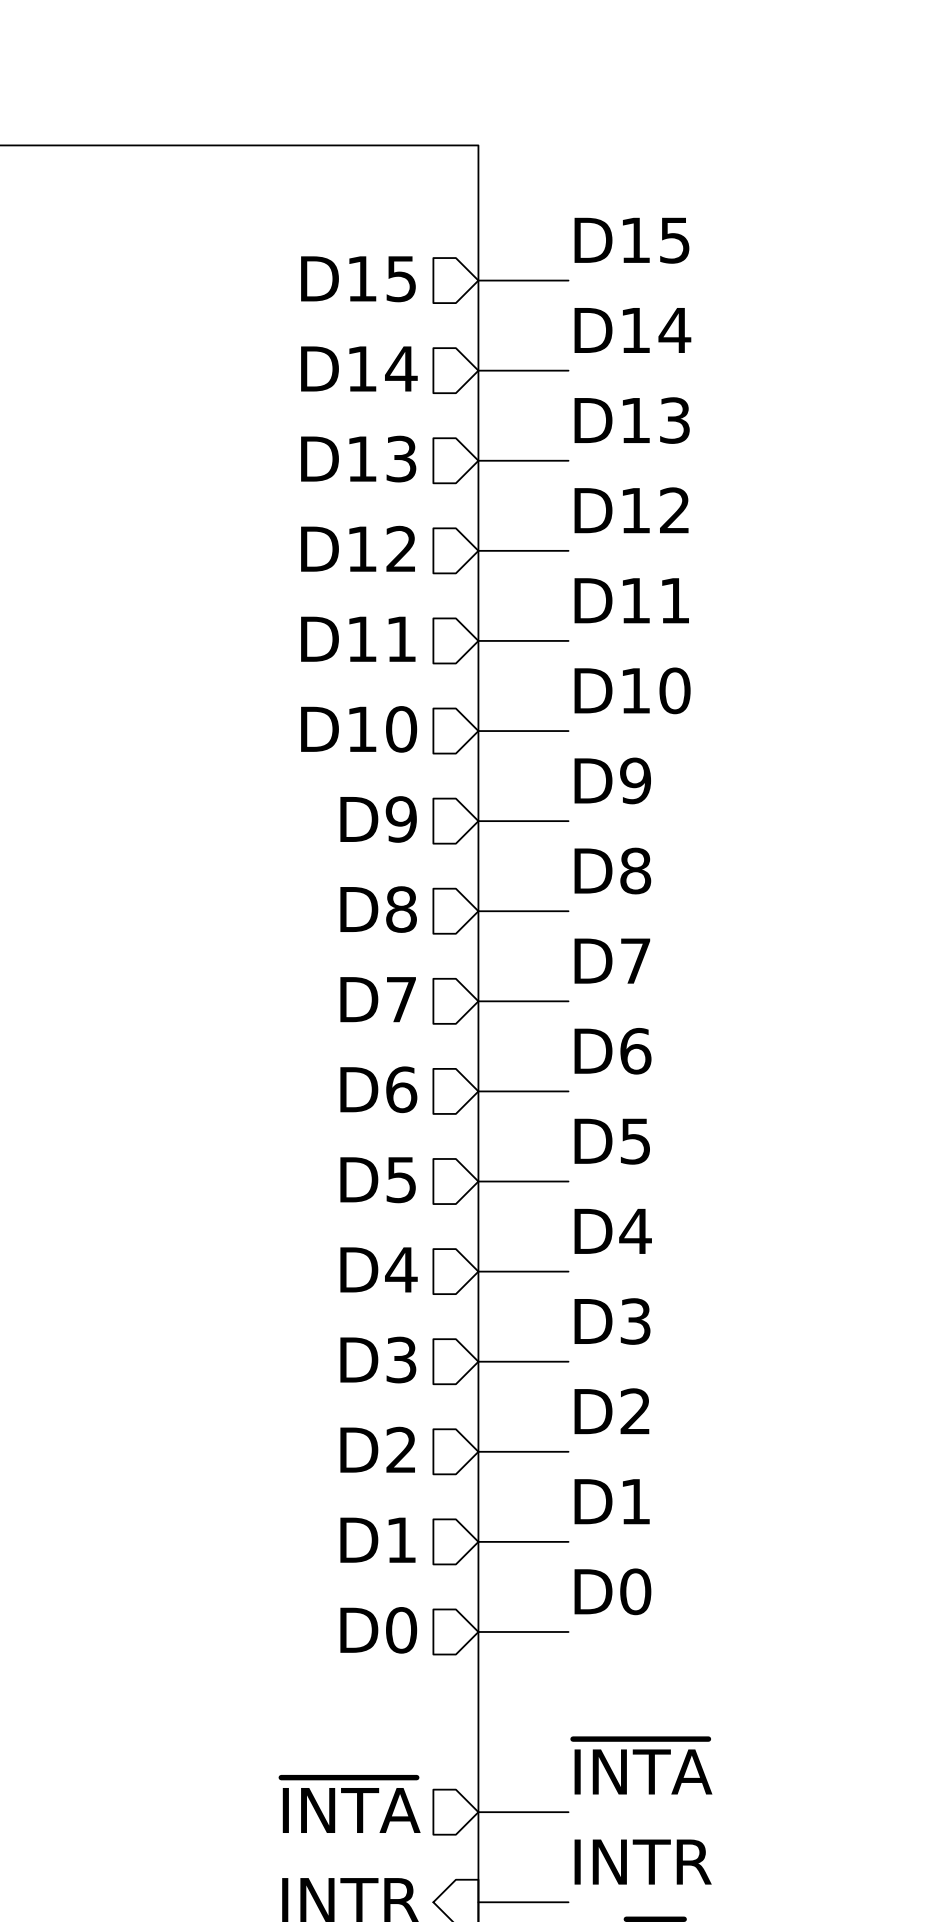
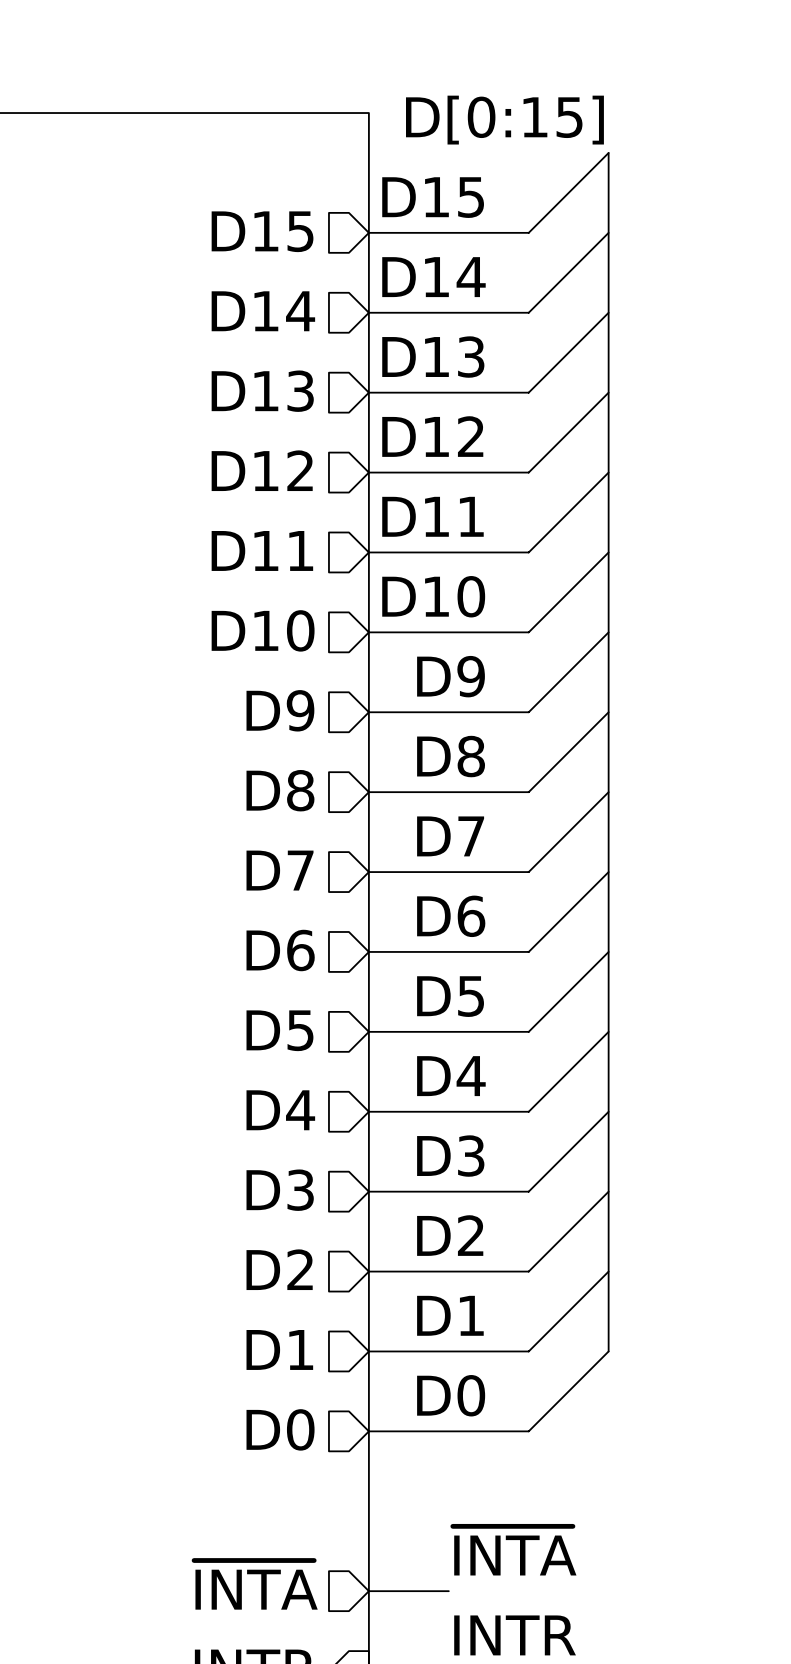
label: none -> D[0:15] (504, 120)
wire: none -> (608, 152) (528, 232) (448, 232)
bus: none -> (608, 152) (608, 1351)
label position: D15 (631, 240) -> D15 (433, 197)
wire: none -> (608, 232) (528, 312) (448, 312)
label position: D14 (632, 330) -> D14 (433, 277)
wire: none -> (608, 312) (528, 392) (448, 392)
label position: D13 (632, 420) -> D13 (433, 357)
wire: none -> (608, 392) (528, 472) (448, 472)
label position: D12 (631, 510) -> D12 (432, 436)
wire: none -> (608, 472) (528, 552) (448, 552)
label position: D11 (631, 600) -> D11 (432, 516)
wire: none -> (608, 552) (528, 632) (448, 632)
label position: D10 (632, 690) -> D10 (433, 596)
wire: none -> (608, 632) (528, 712) (448, 712)
label position: D9 (612, 780) -> D9 (451, 676)
wire: none -> (608, 712) (528, 792) (448, 792)
label position: D8 (612, 871) -> D8 (451, 756)
wire: none -> (608, 792) (528, 872) (448, 872)
label position: D7 (612, 961) -> D7 (450, 836)
wire: none -> (608, 872) (528, 951) (448, 951)
label position: D6 (613, 1051) -> D6 (451, 916)
wire: none -> (608, 951) (528, 1031) (448, 1031)
label position: D5 (612, 1141) -> D5 (450, 996)
wire: none -> (608, 1031) (528, 1111) (448, 1111)
label position: D4 (613, 1231) -> D4 (451, 1076)
wire: none -> (608, 1111) (528, 1191) (448, 1191)
label position: D3 (612, 1321) -> D3 (450, 1156)
wire: none -> (608, 1191) (528, 1271) (448, 1271)
label position: D2 (611, 1411) -> D2 (450, 1235)
wire: none -> (608, 1271) (528, 1351) (448, 1351)
label position: D1 (612, 1501) -> D1 (450, 1315)
wire: none -> (608, 1351) (528, 1431) (448, 1431)
label position: D0 (612, 1591) -> D0 (451, 1395)

